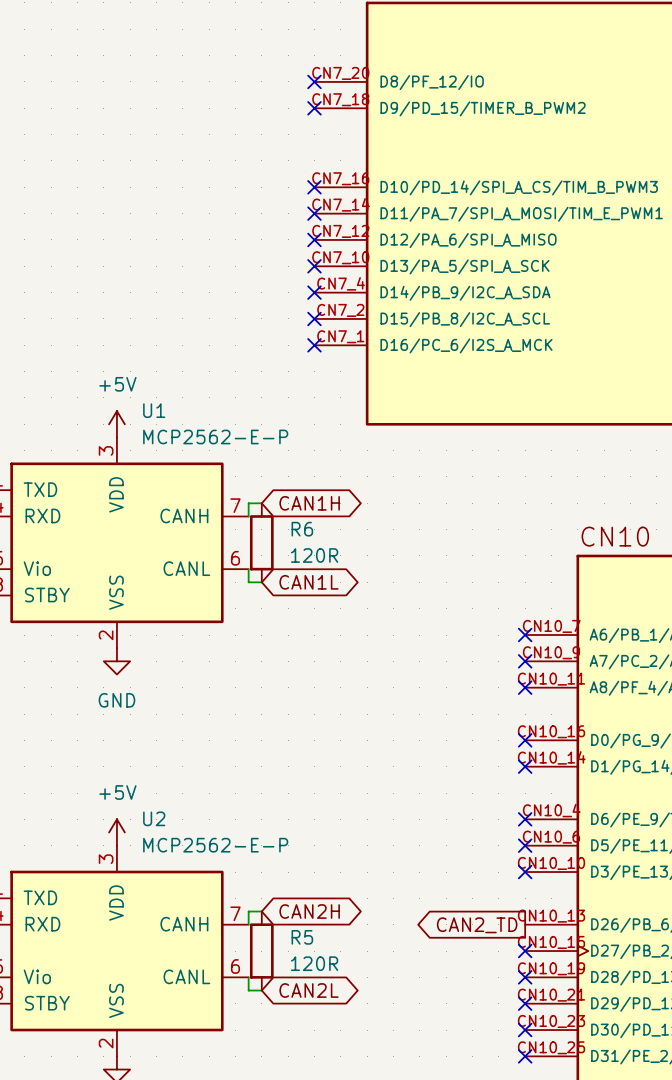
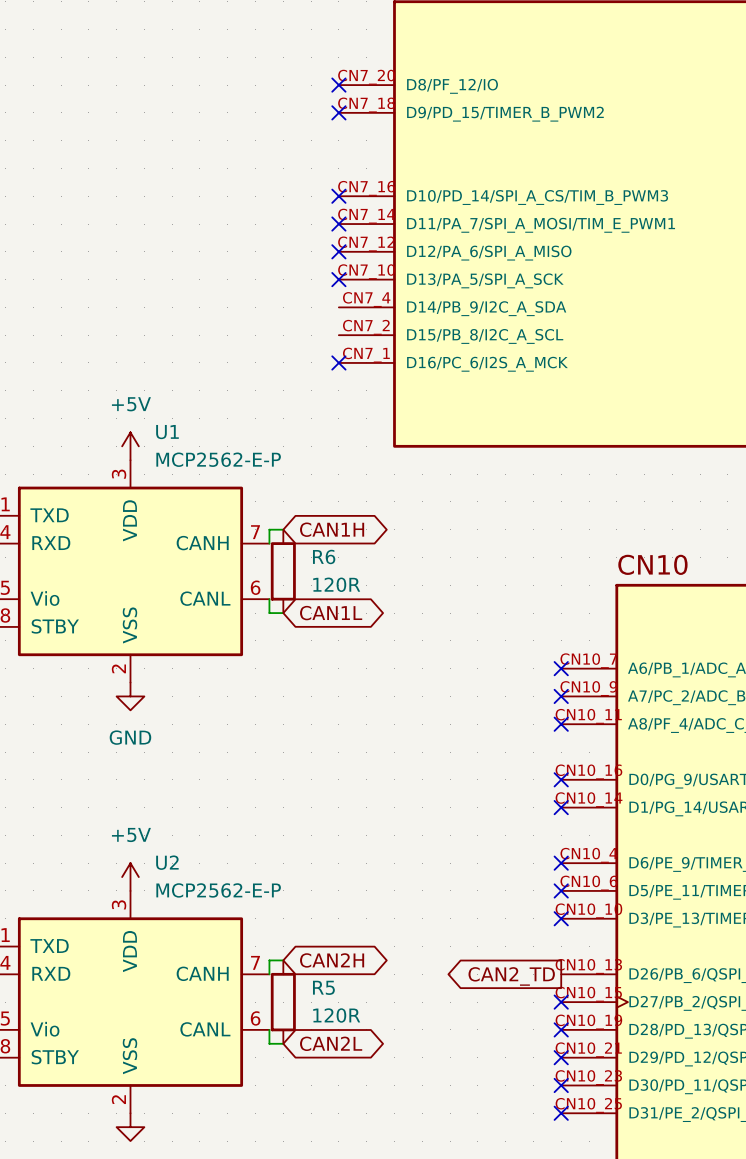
no-connect mark: (314, 292) -> none
no-connect mark: (314, 318) -> none

